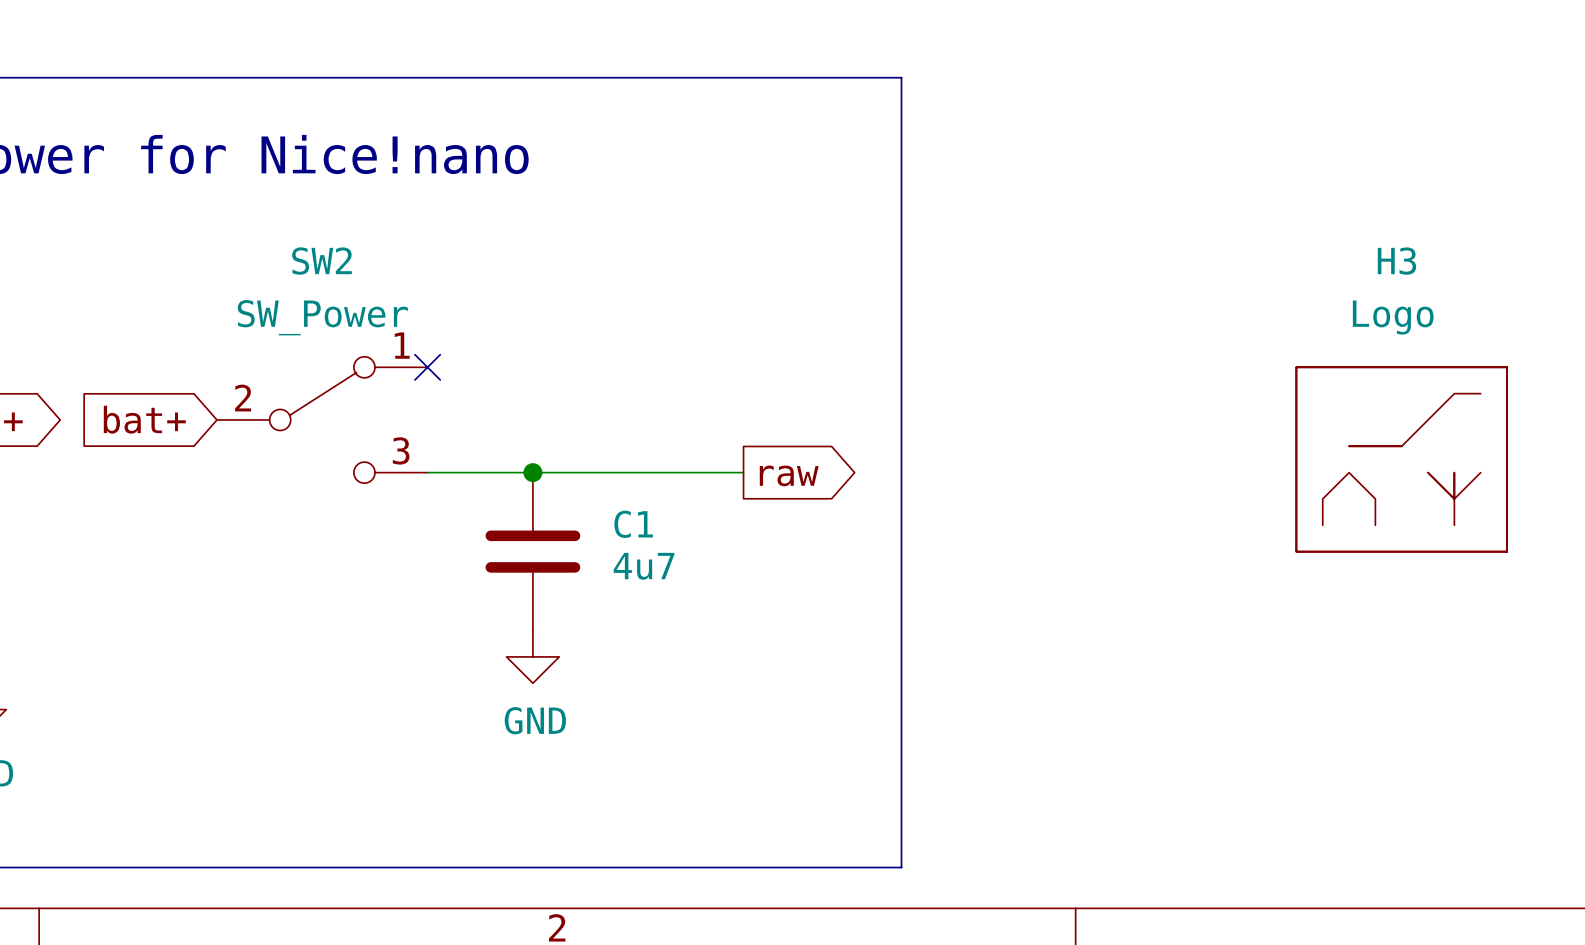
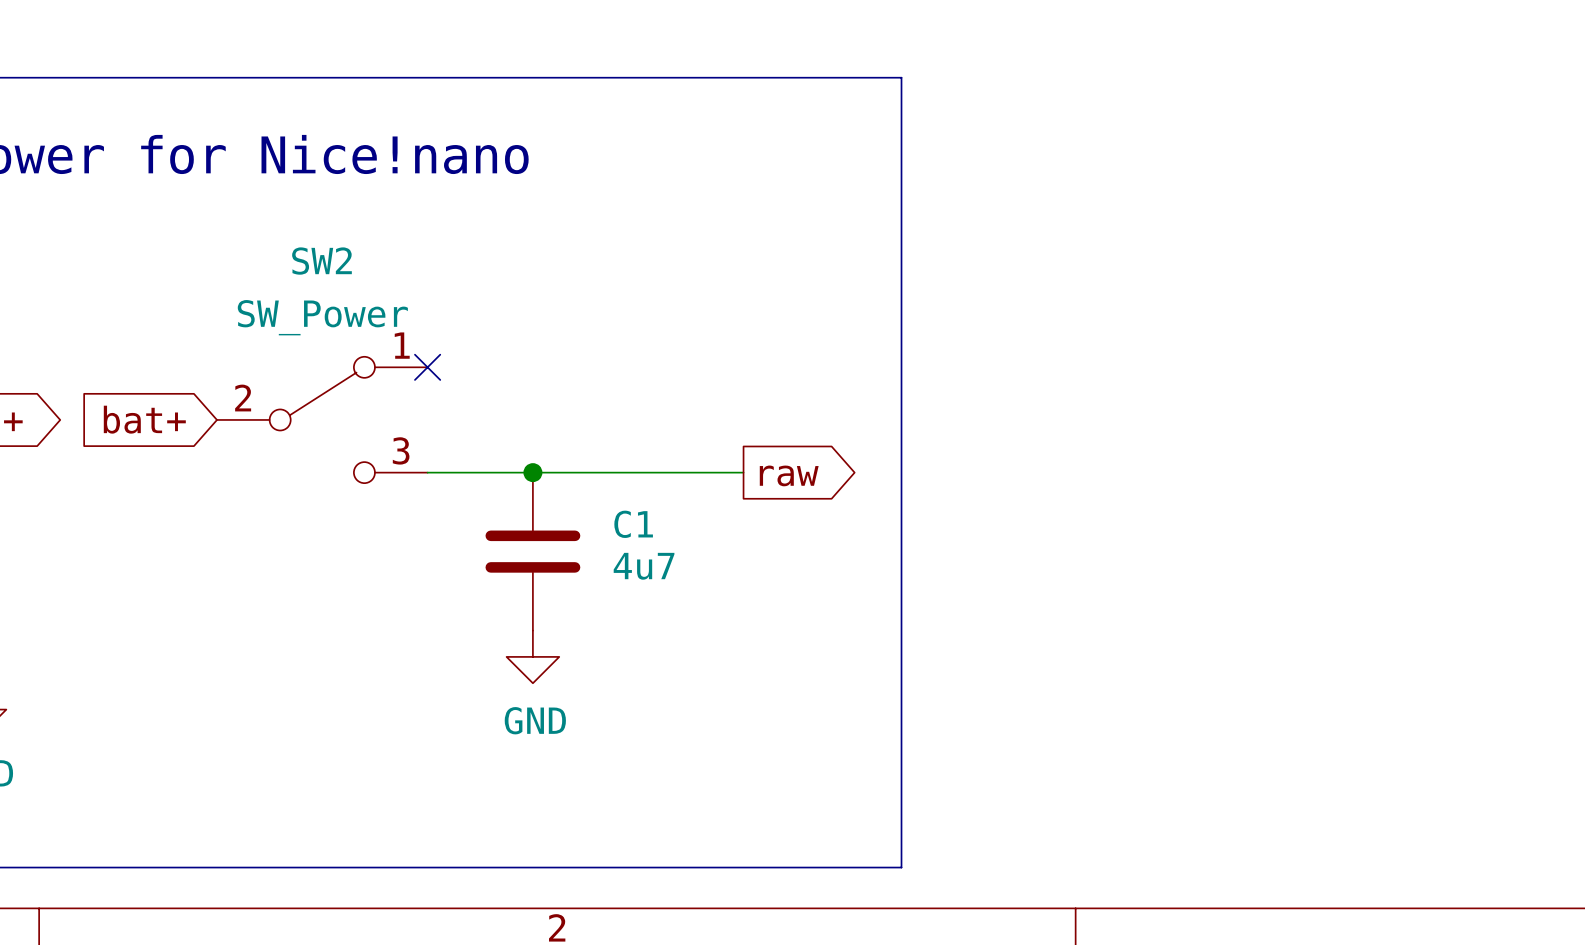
H3: Logo (1401, 459) -> none

